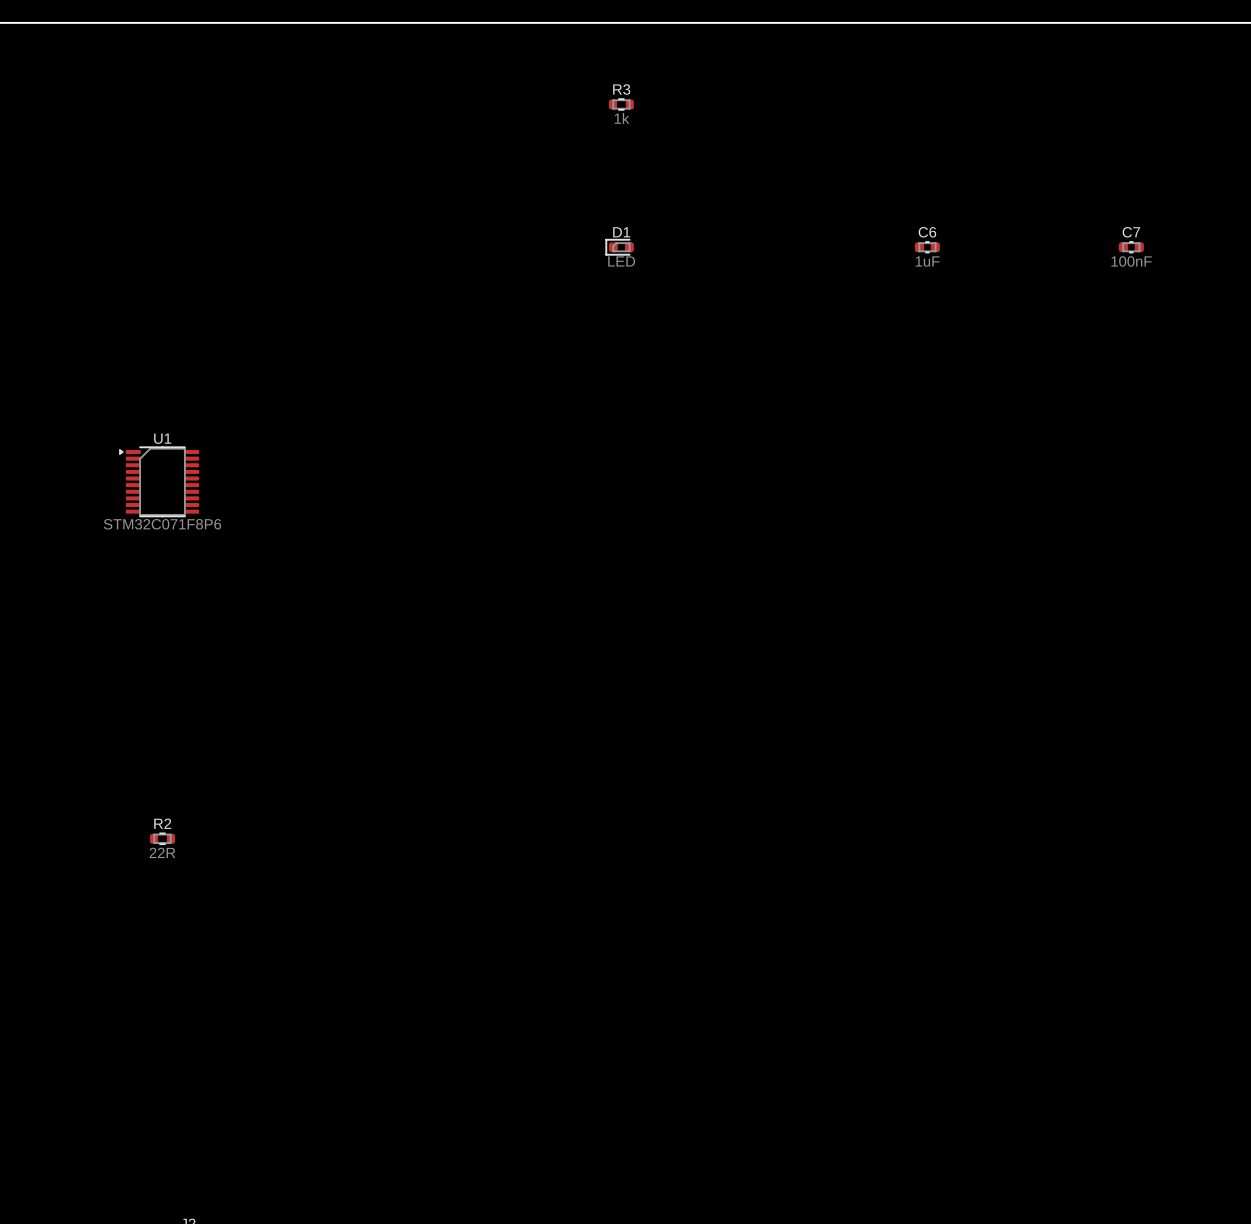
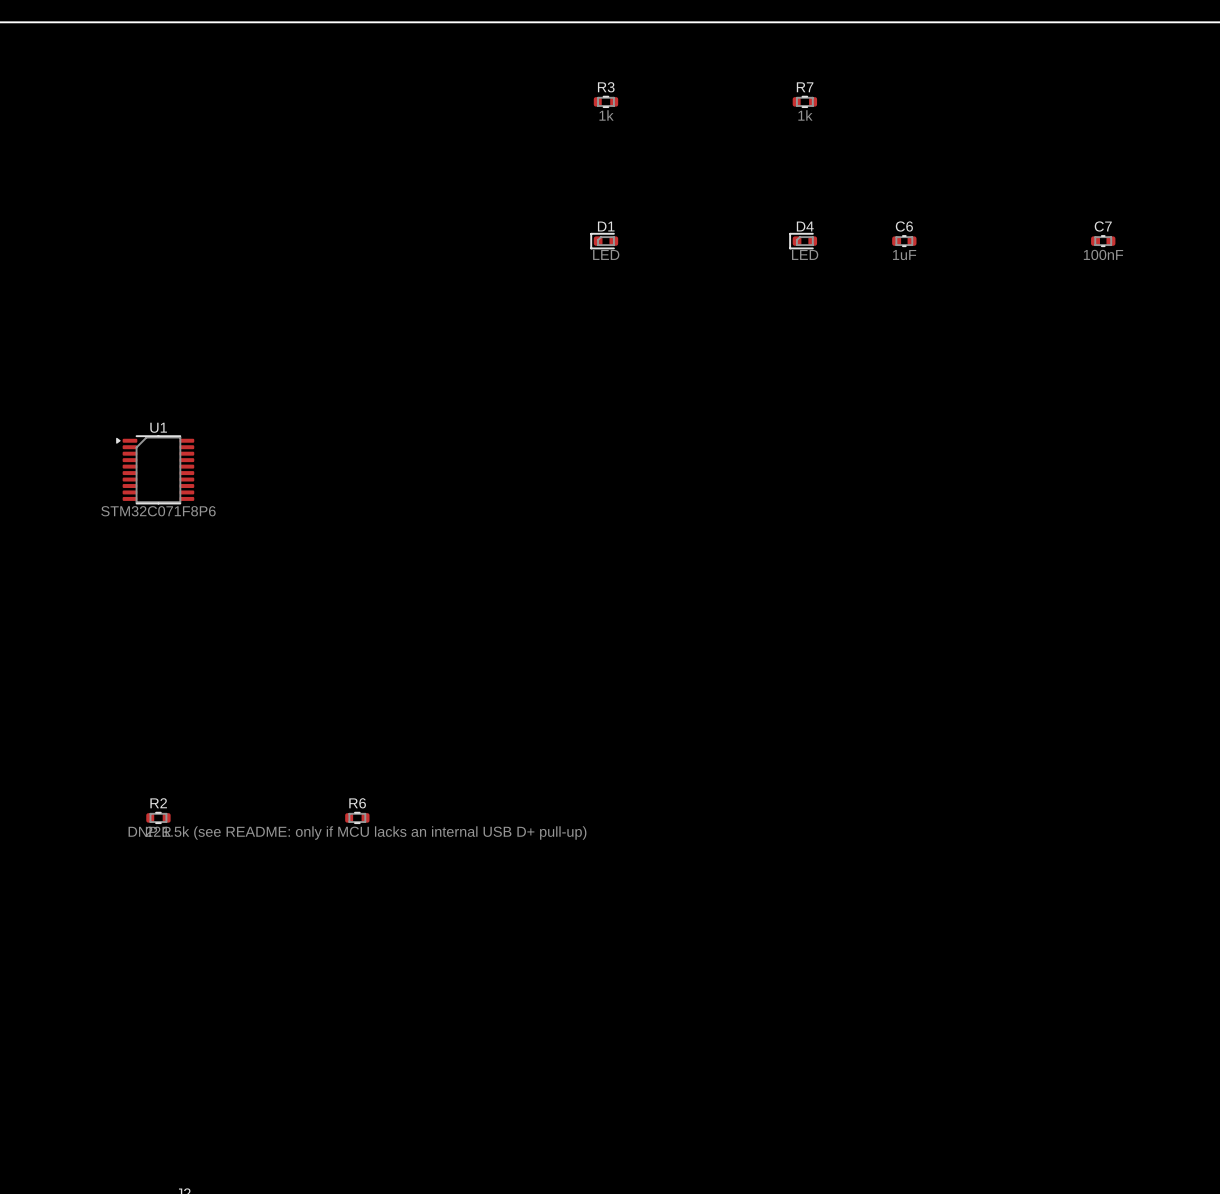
R7: none -> 1k (804, 101)
D4: none -> LED (803, 241)
R6: none -> DNP 1.5k (see README: only if MCU lacks an internal USB D+ pull-up) (357, 817)

